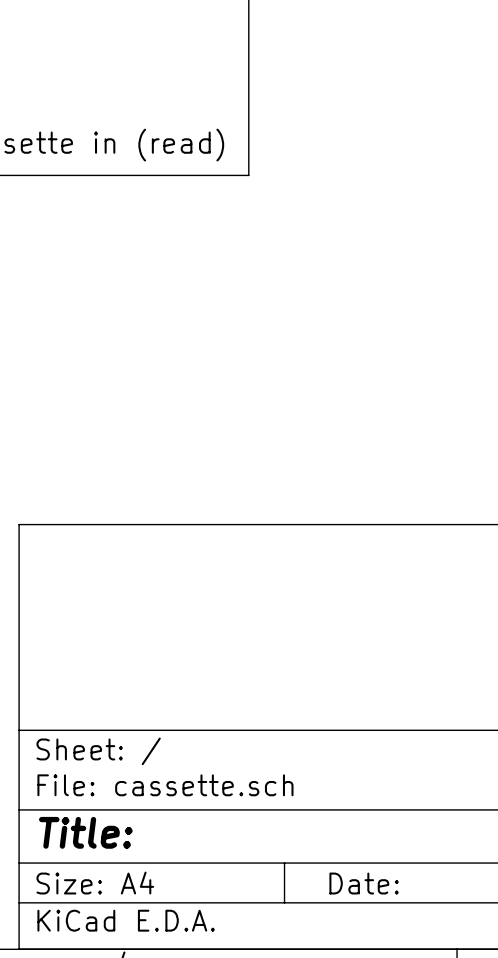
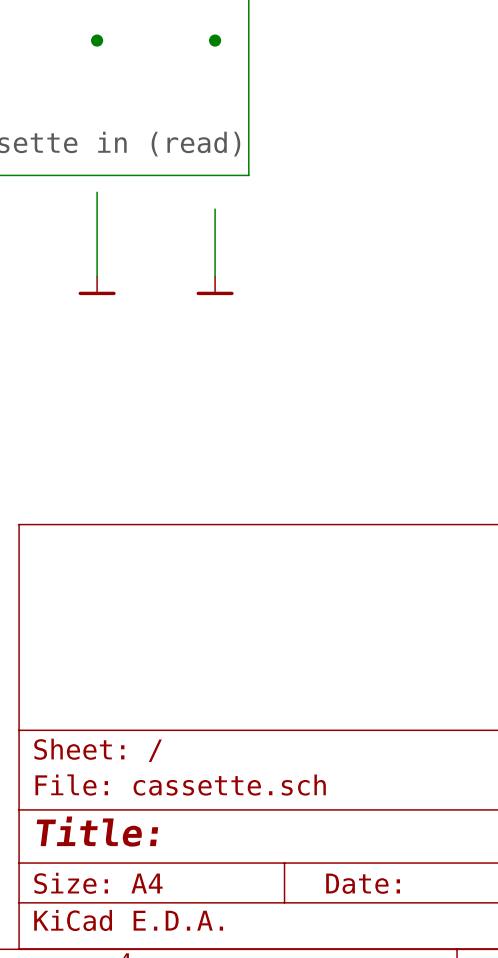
junction: none -> (97, 40)
junction: none -> (215, 40)
wire: none -> (97, 192) (97, 276)
wire: none -> (215, 209) (215, 276)
power symbol: none -> (97, 285)
power symbol: none -> (215, 285)

